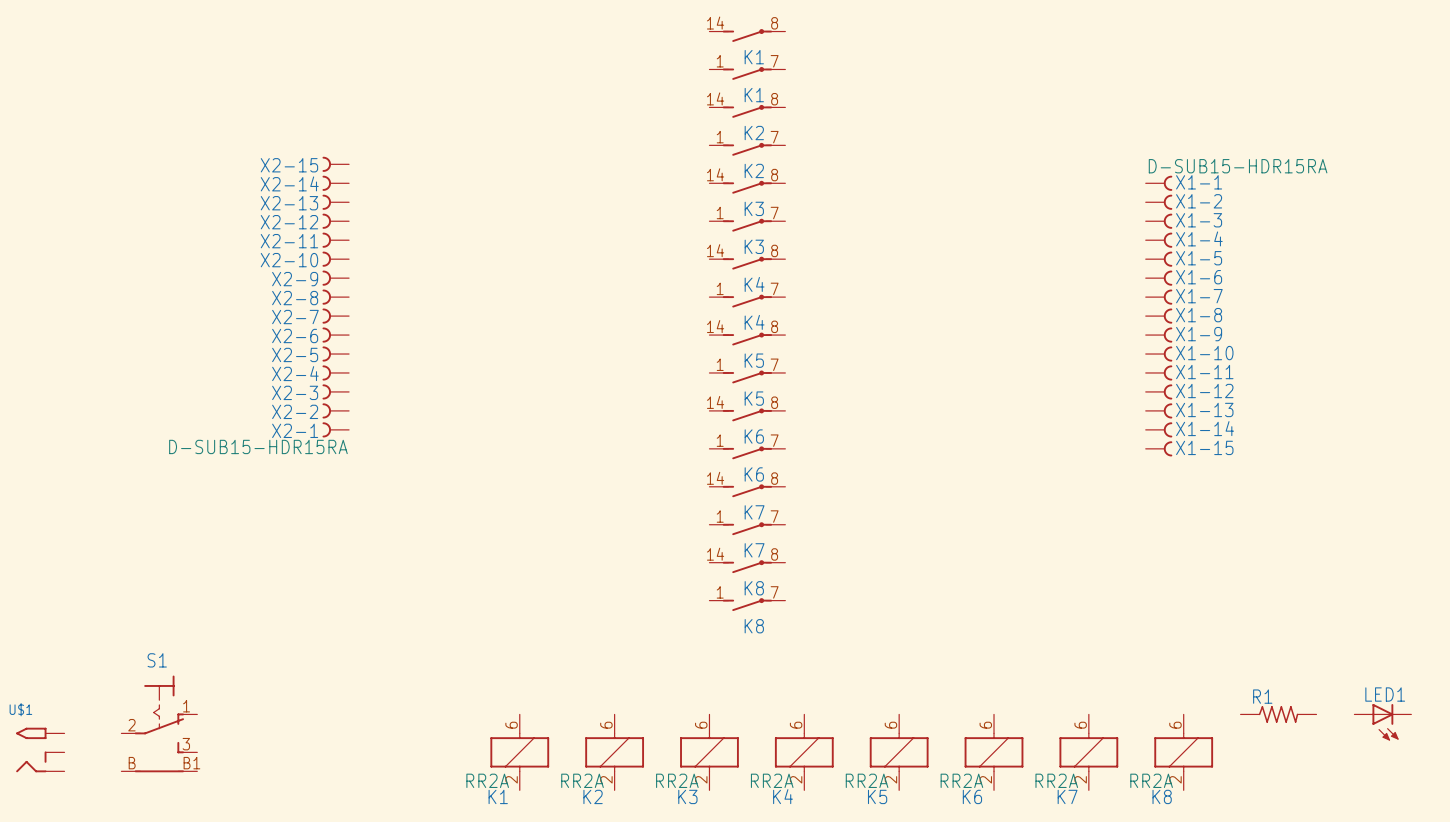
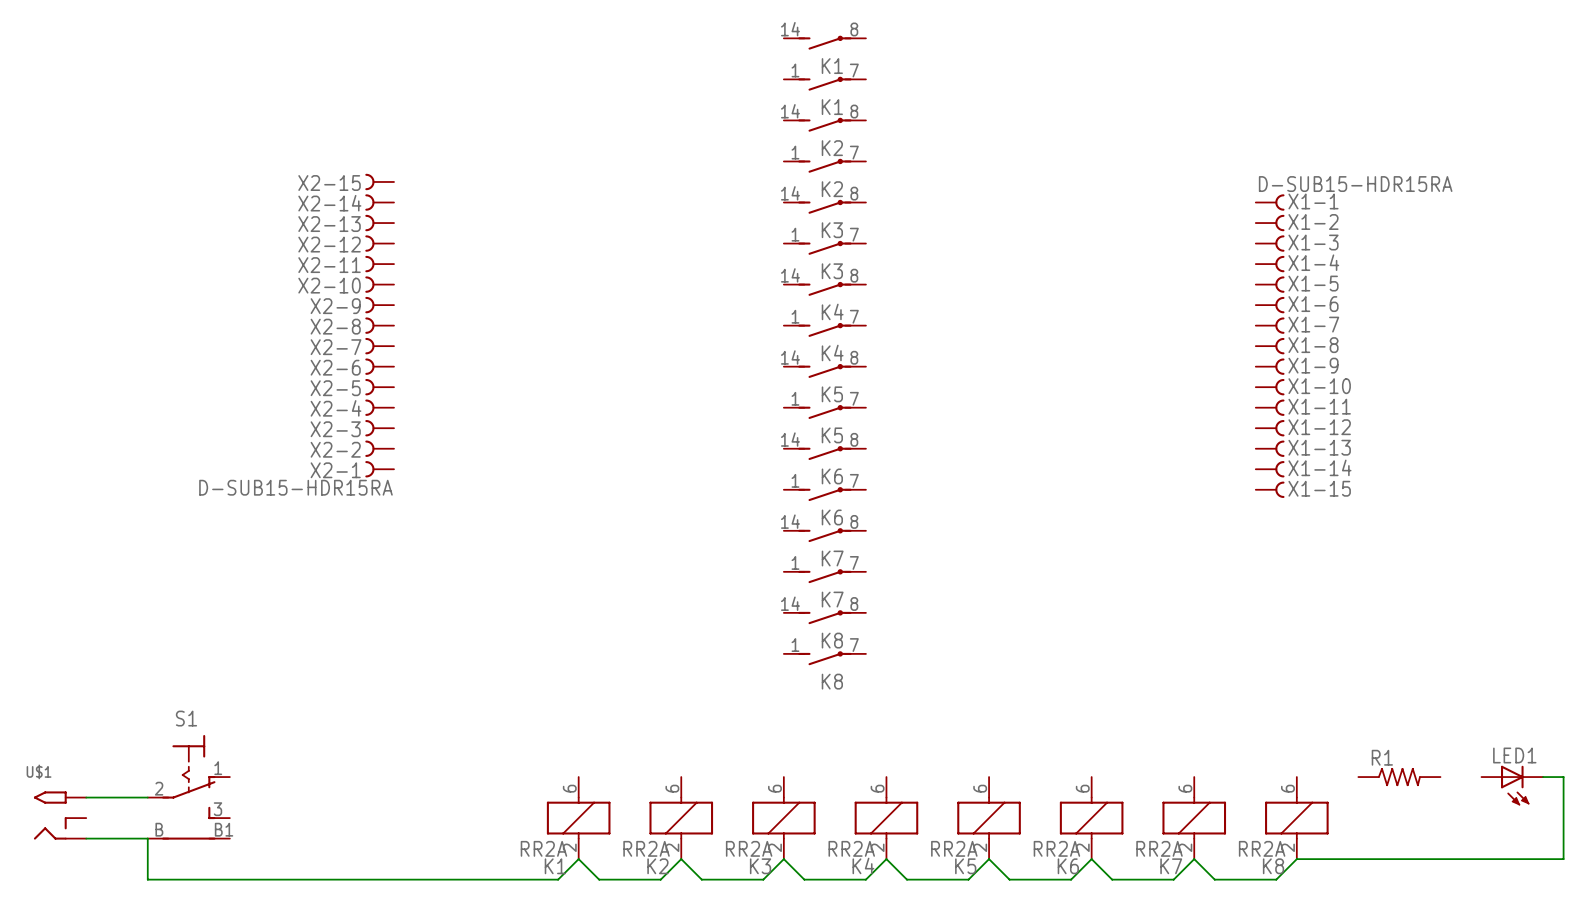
wire: none -> (1543, 777) (1563, 777) (1563, 859) (1296, 859) (1276, 879) (1214, 879) (1194, 859) (1173, 879) (1112, 879) (1091, 859) (1071, 879) (1009, 879) (989, 859) (968, 879) (906, 879) (886, 859) (865, 879) (804, 879) (783, 859) (763, 879) (701, 879) (681, 859) (660, 879) (599, 879) (578, 859) (558, 879) (147, 879) (147, 838) (86, 838)
wire: none -> (86, 797) (147, 797)

